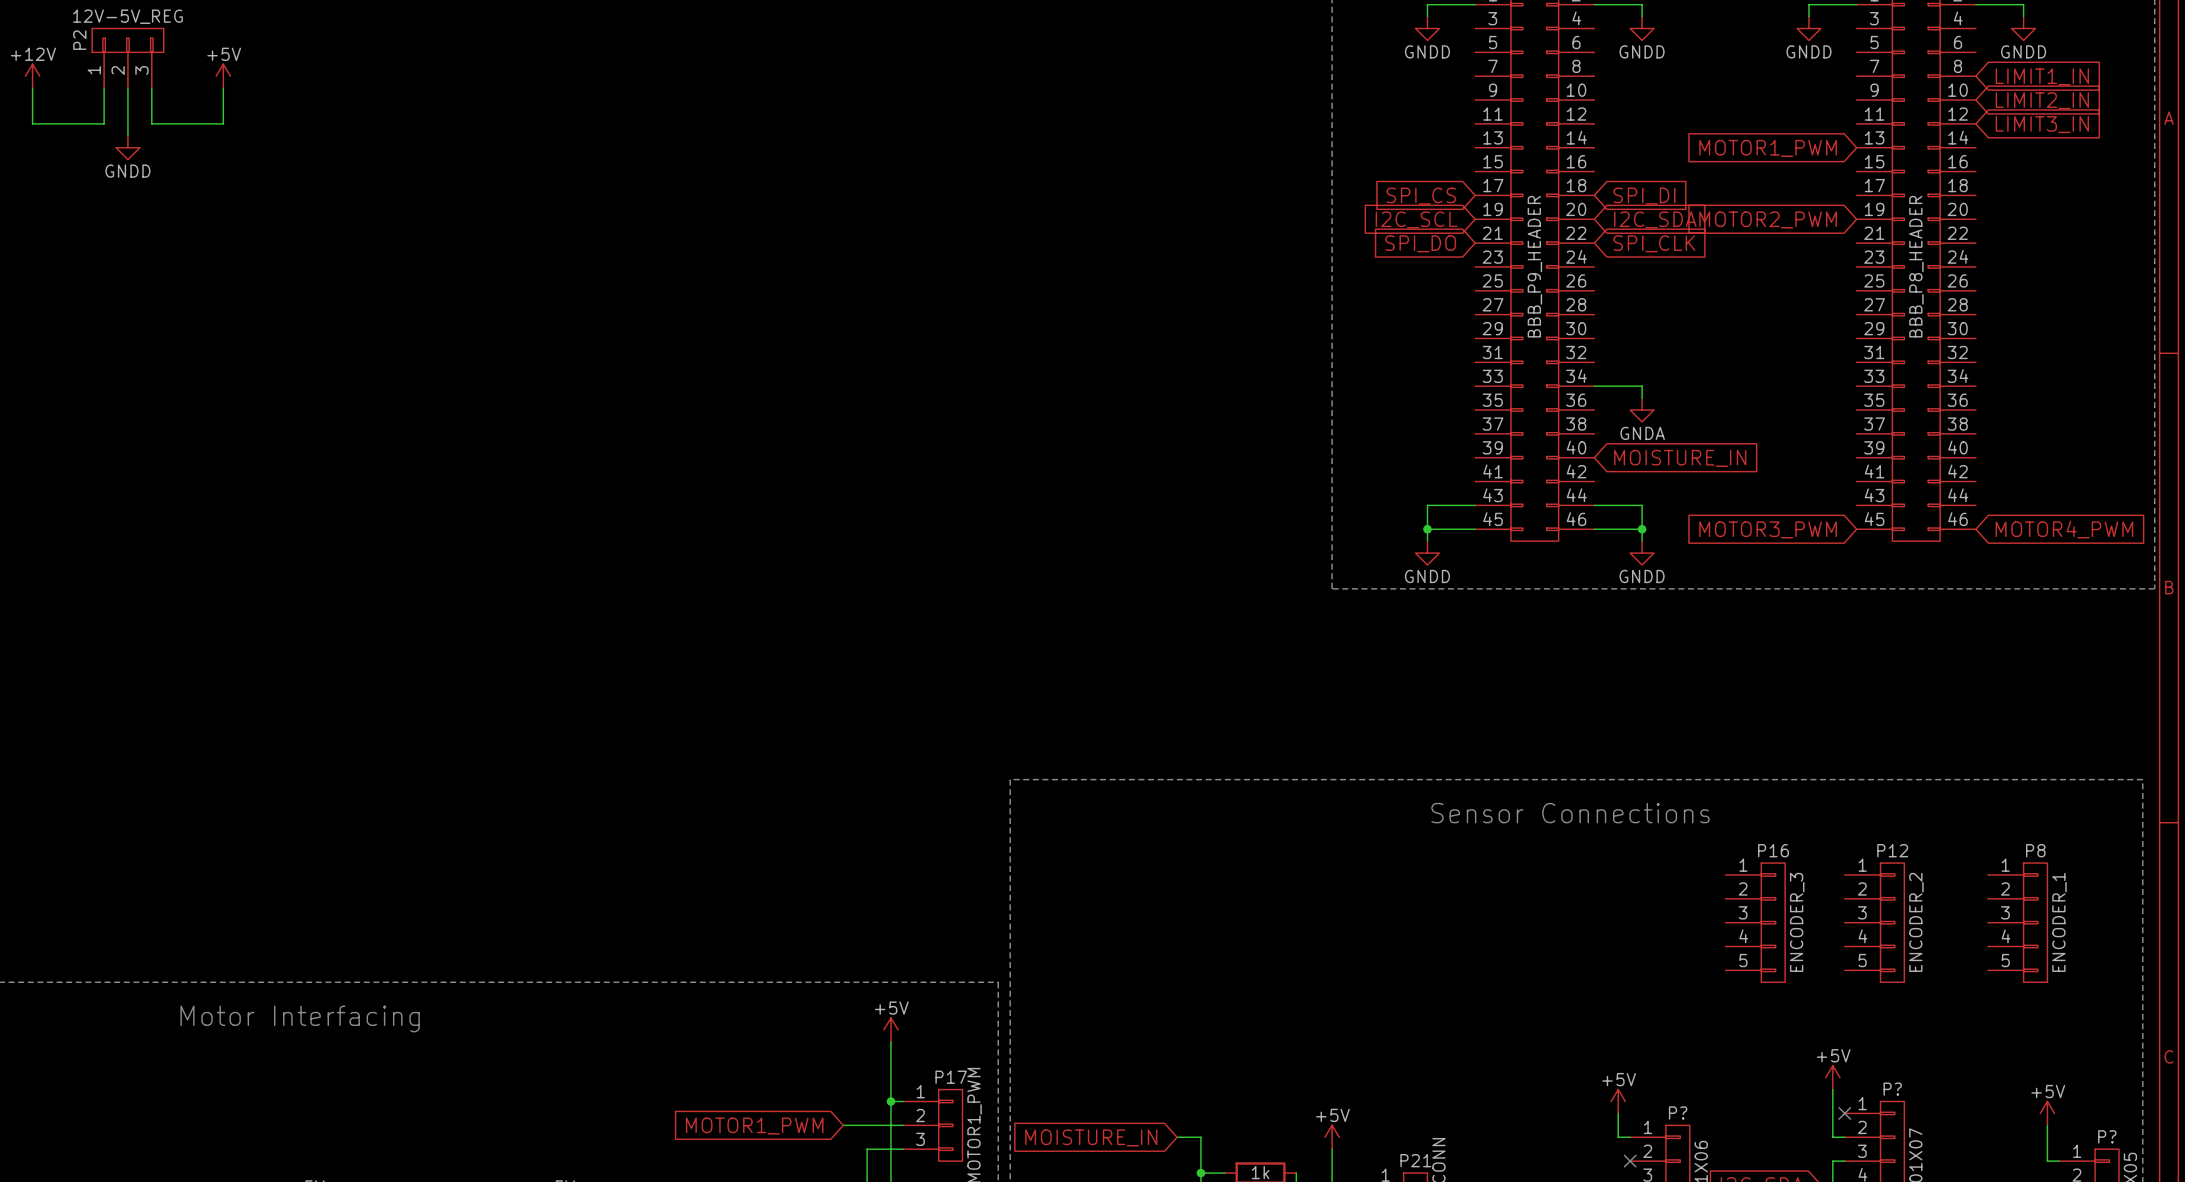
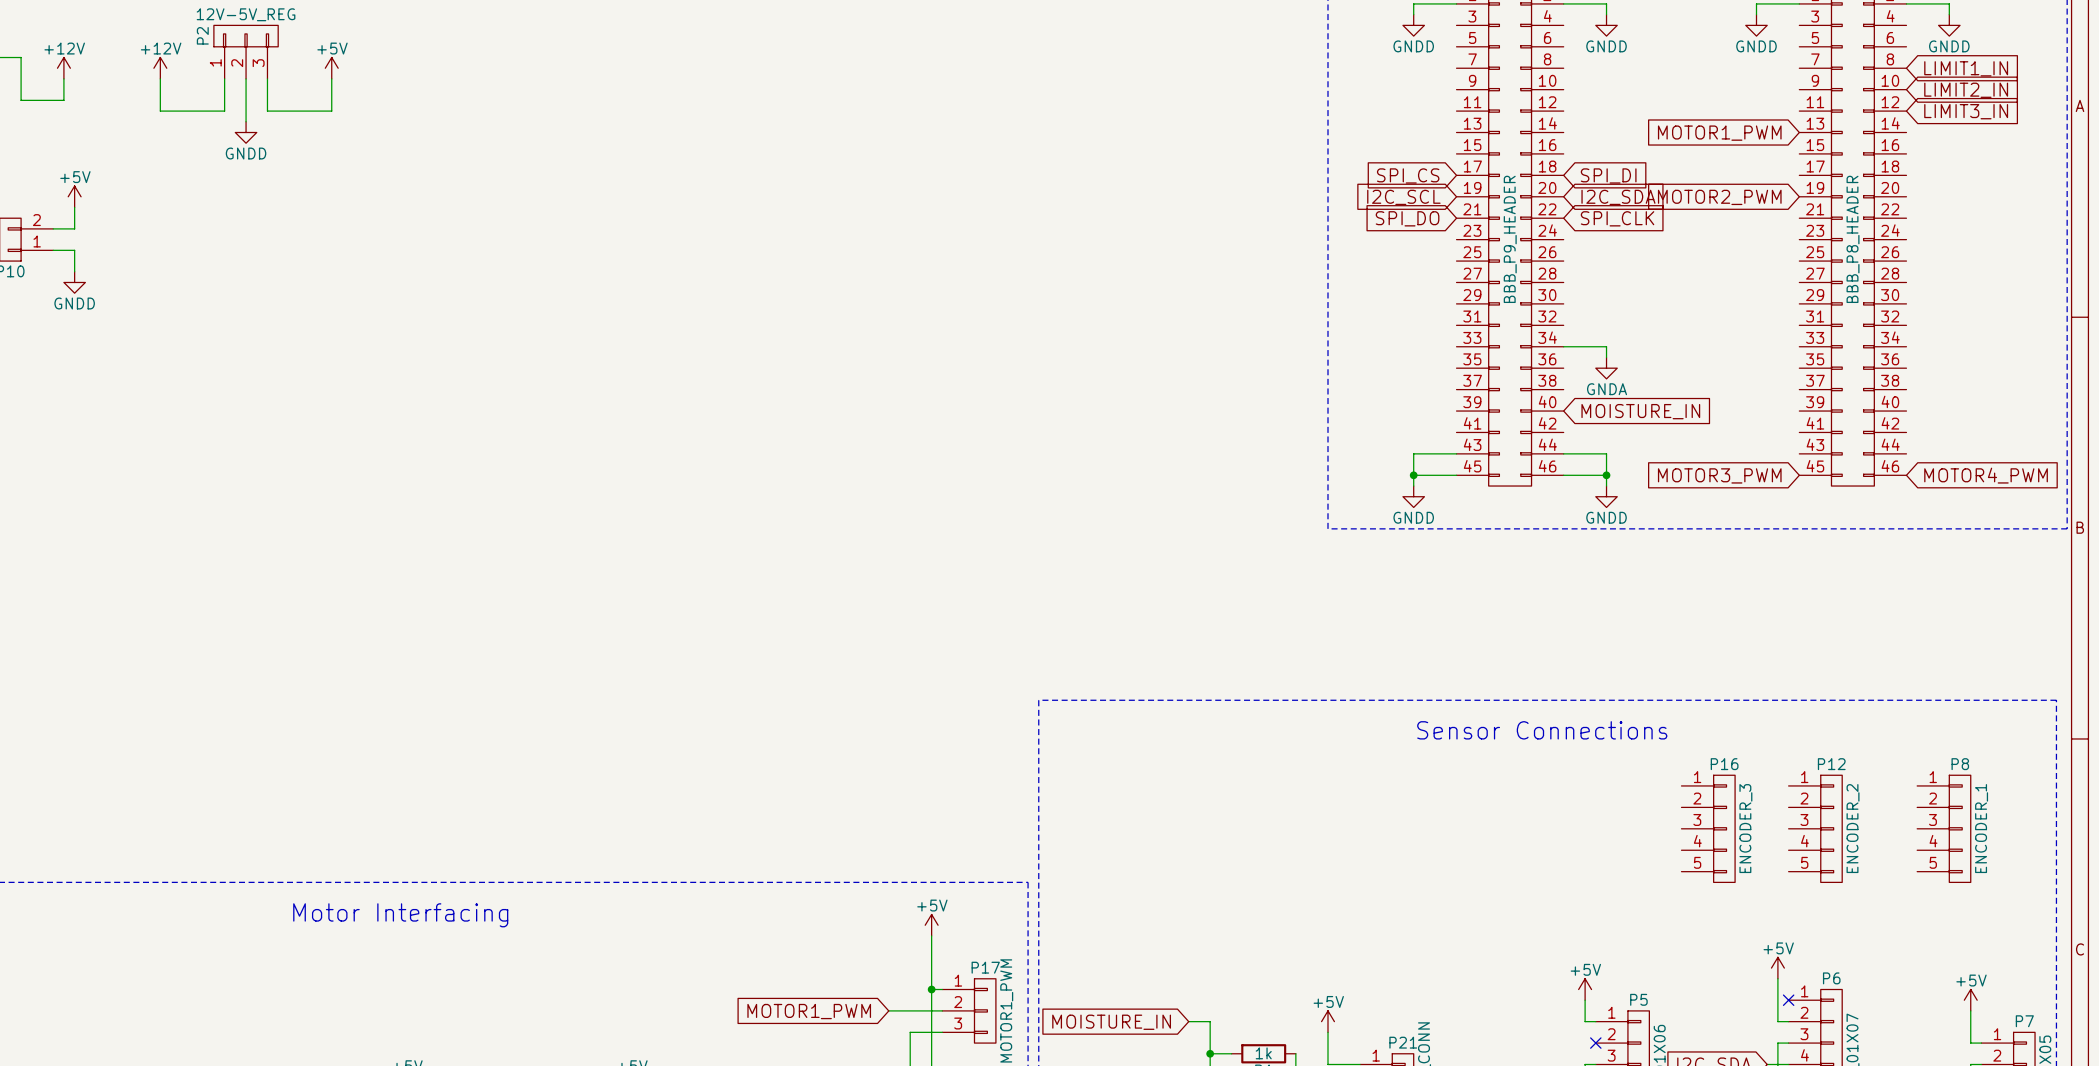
P? name: P? (1892, 1089) -> P6 (1831, 978)
P? name: P? (1678, 1112) -> P5 (1638, 999)
P? name: P? (2107, 1136) -> P7 (2024, 1021)

